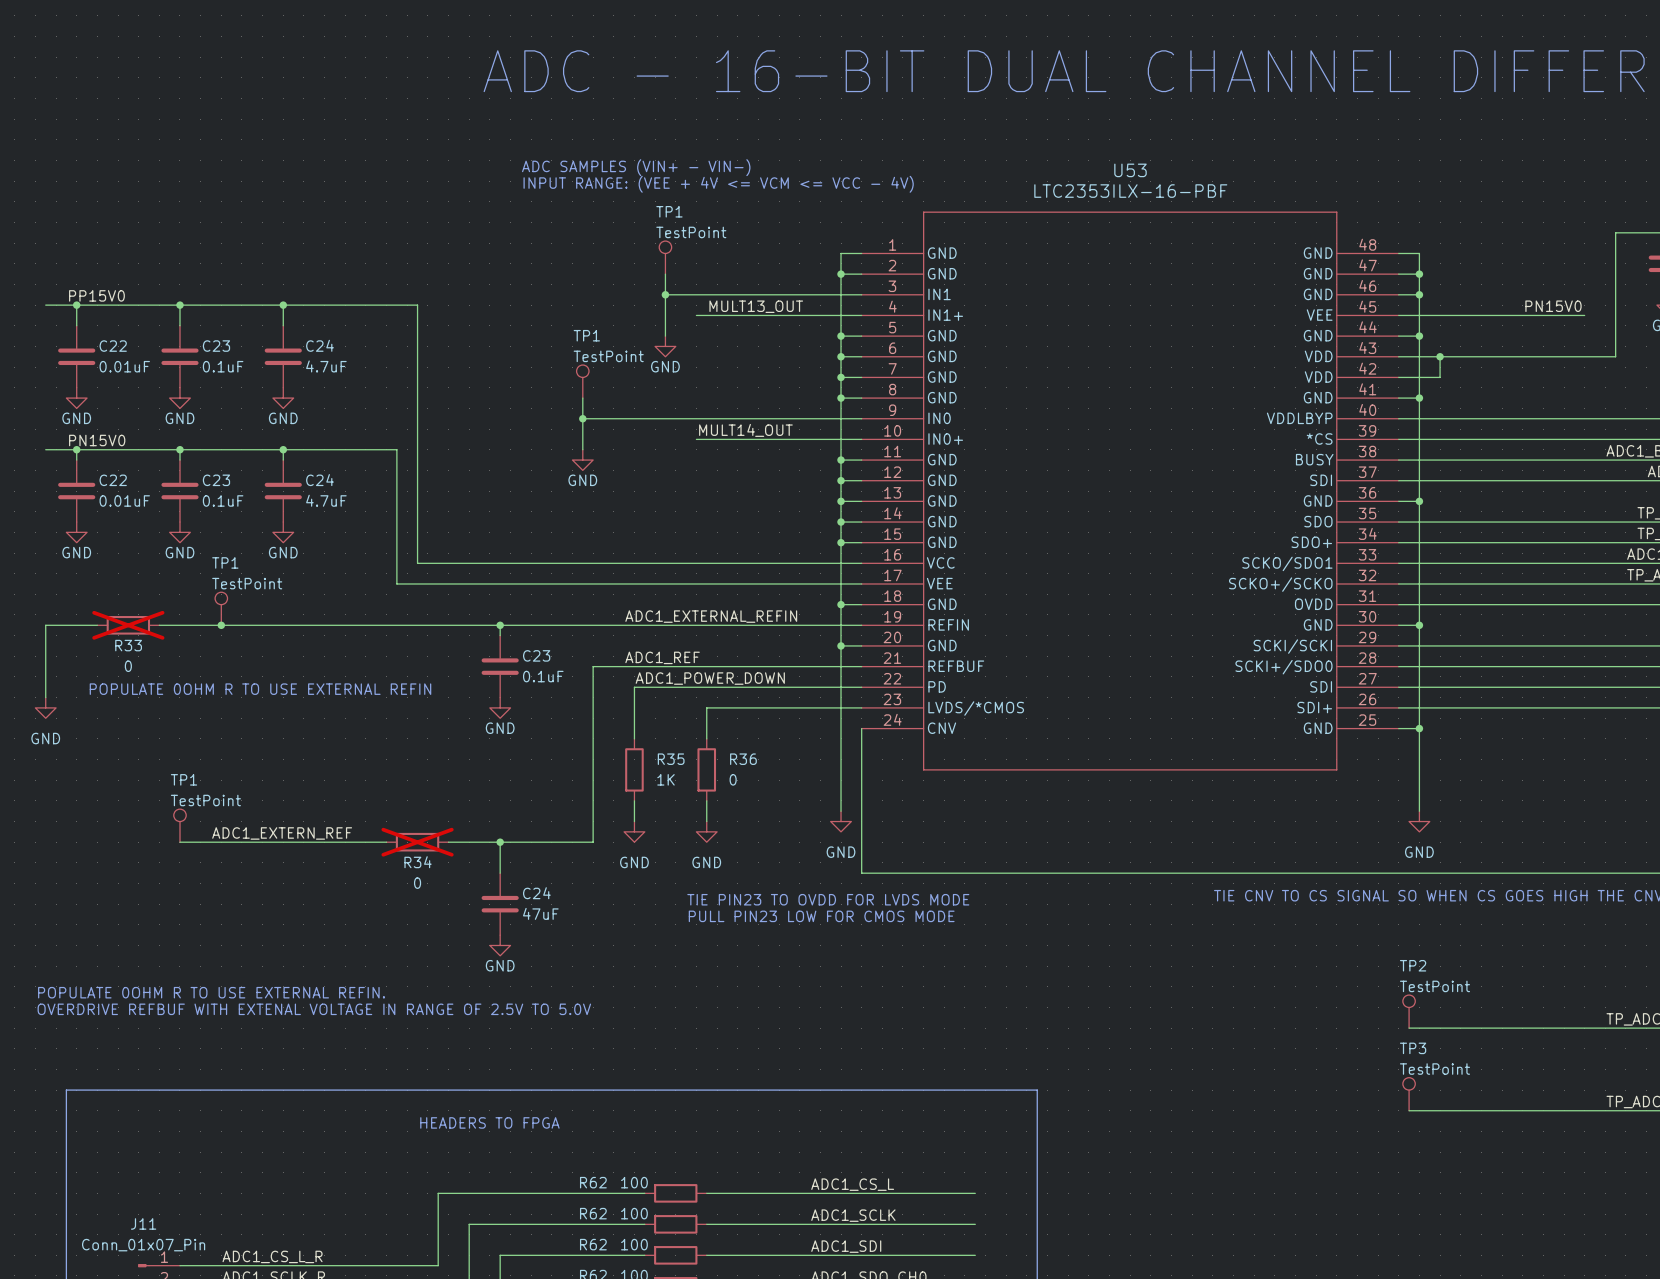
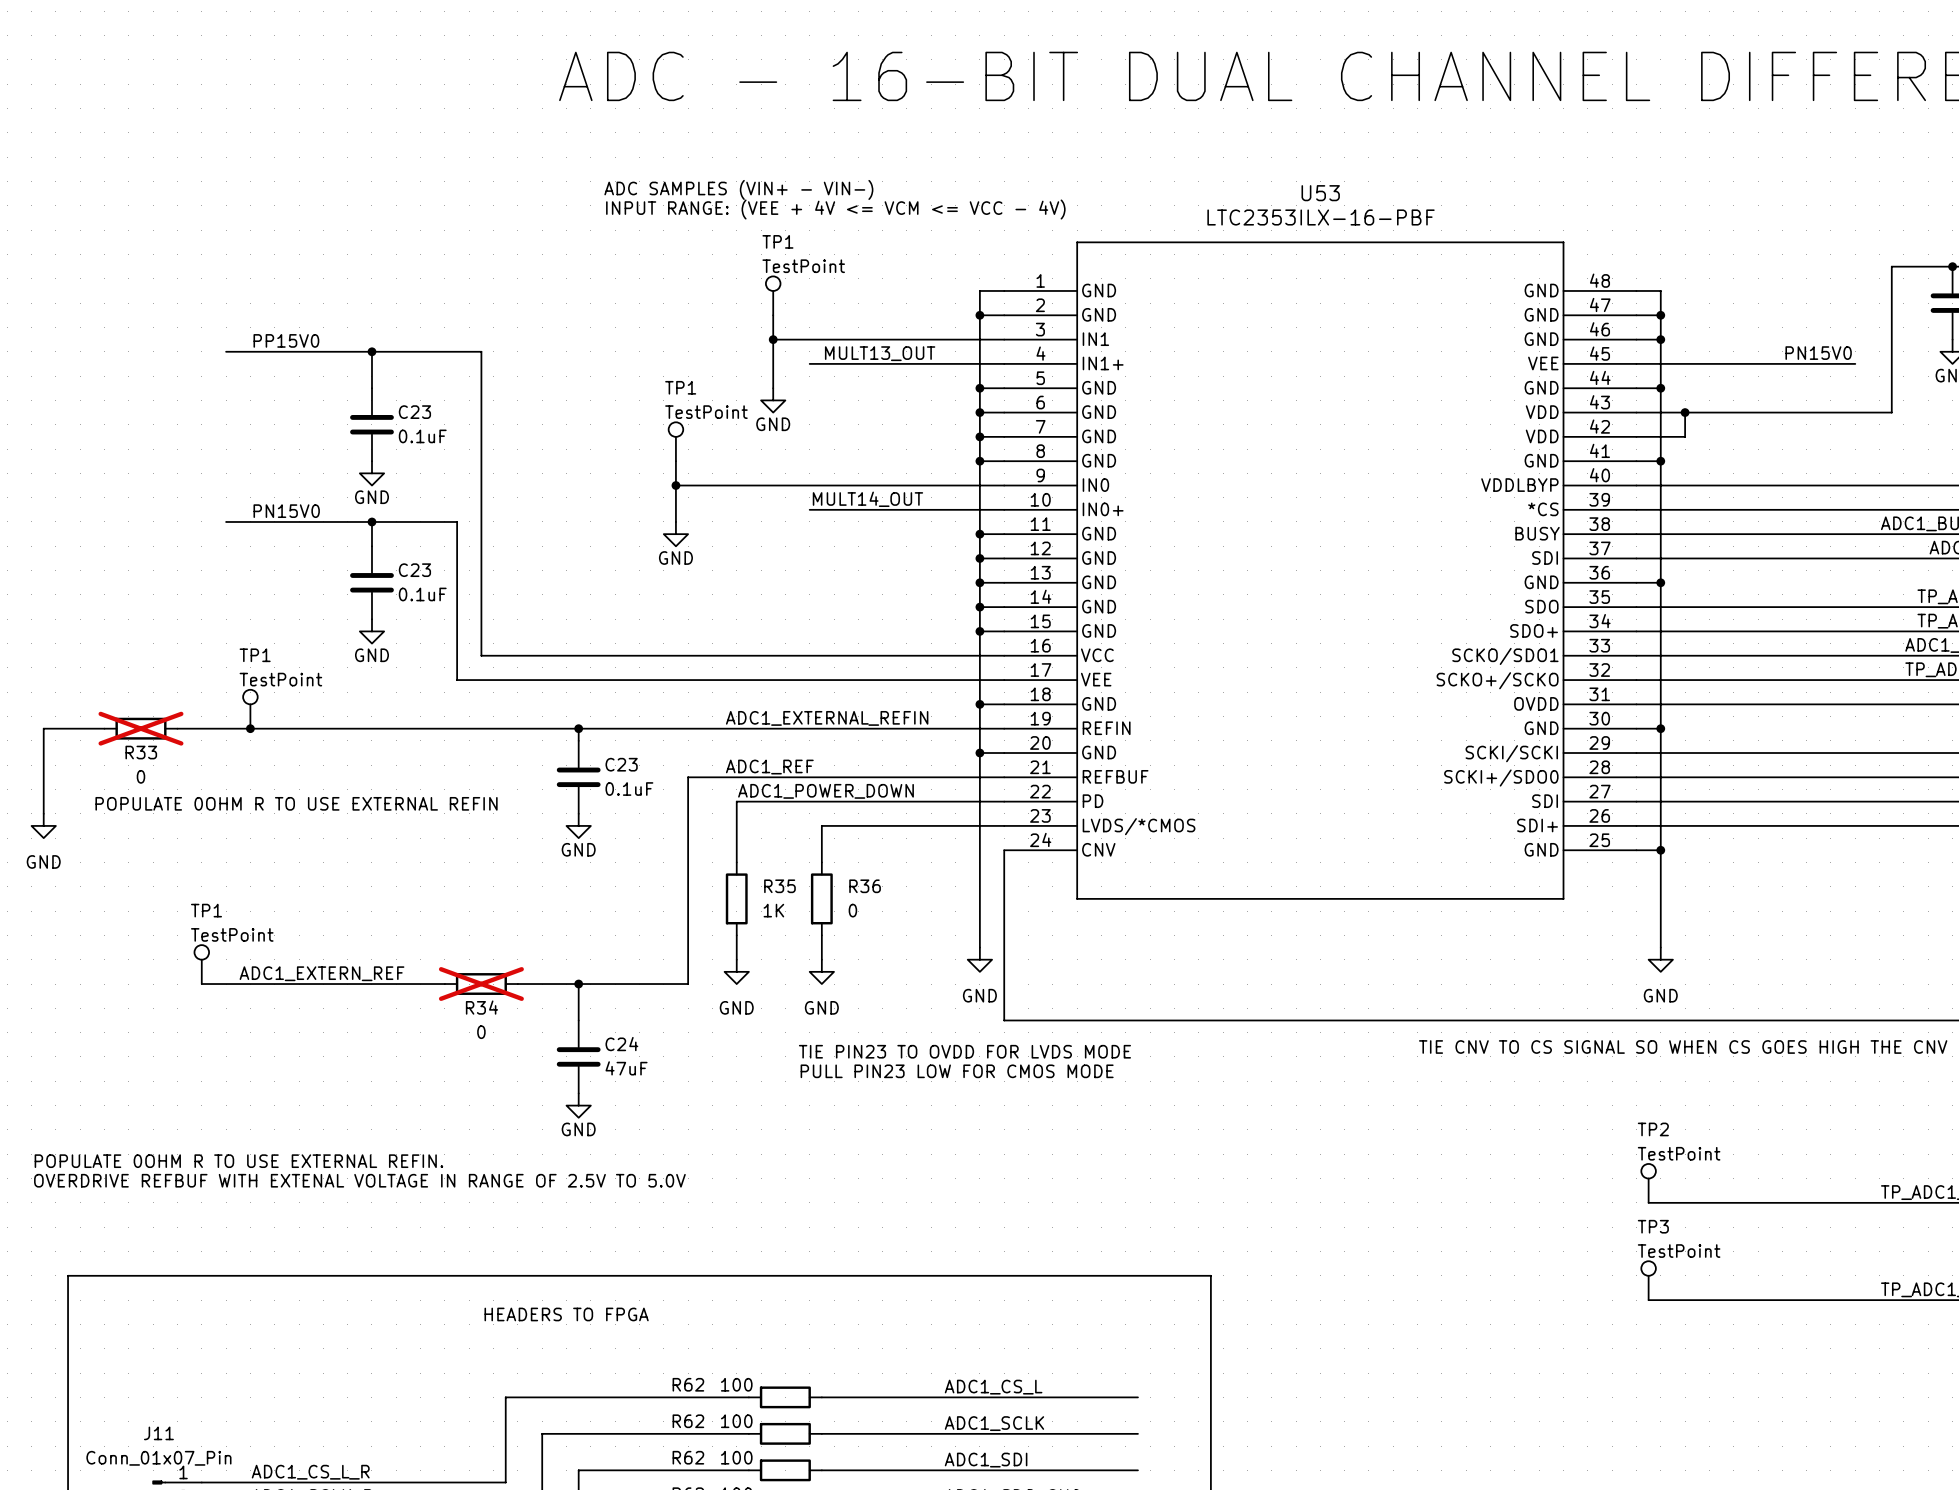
label position: PP15V0 (96, 295) -> PP15V0 (286, 340)
wire: (45, 305) (200, 305) -> none
wire: (76, 305) (76, 325) -> none
junction: (76, 305) -> none
wire: (179, 305) (179, 325) -> none
junction: (179, 305) -> none
wire: (283, 305) (283, 325) -> (371, 521) (371, 546)
junction position: (283, 305) -> (371, 351)
wire: none -> (371, 351) (371, 388)
C22: 0.01uF (76, 356) -> none
C23: 0.1uF (179, 356) -> none
C24: 4.7uF (283, 356) -> none
C23: none -> 0.1uF (371, 424)
power symbol: GND (76, 398) -> none
power symbol: GND (179, 398) -> none
power symbol position: GND (283, 398) -> GND (371, 473)
label position: PN15V0 (97, 440) -> PN15V0 (286, 511)
wire: (45, 449) (200, 449) -> none
wire: (76, 449) (76, 460) -> none
junction: (76, 449) -> none
wire: (179, 449) (179, 460) -> none
junction: (179, 449) -> none
wire: (283, 449) (283, 460) -> none
junction position: (283, 449) -> (371, 521)
C22: 0.01uF (76, 491) -> none
C23: 0.1uF (179, 491) -> none
C24: 4.7uF (283, 491) -> none
C23: none -> 0.1uF (371, 582)
power symbol: GND (76, 532) -> none
power symbol: GND (179, 532) -> none
power symbol position: GND (283, 532) -> GND (371, 631)

